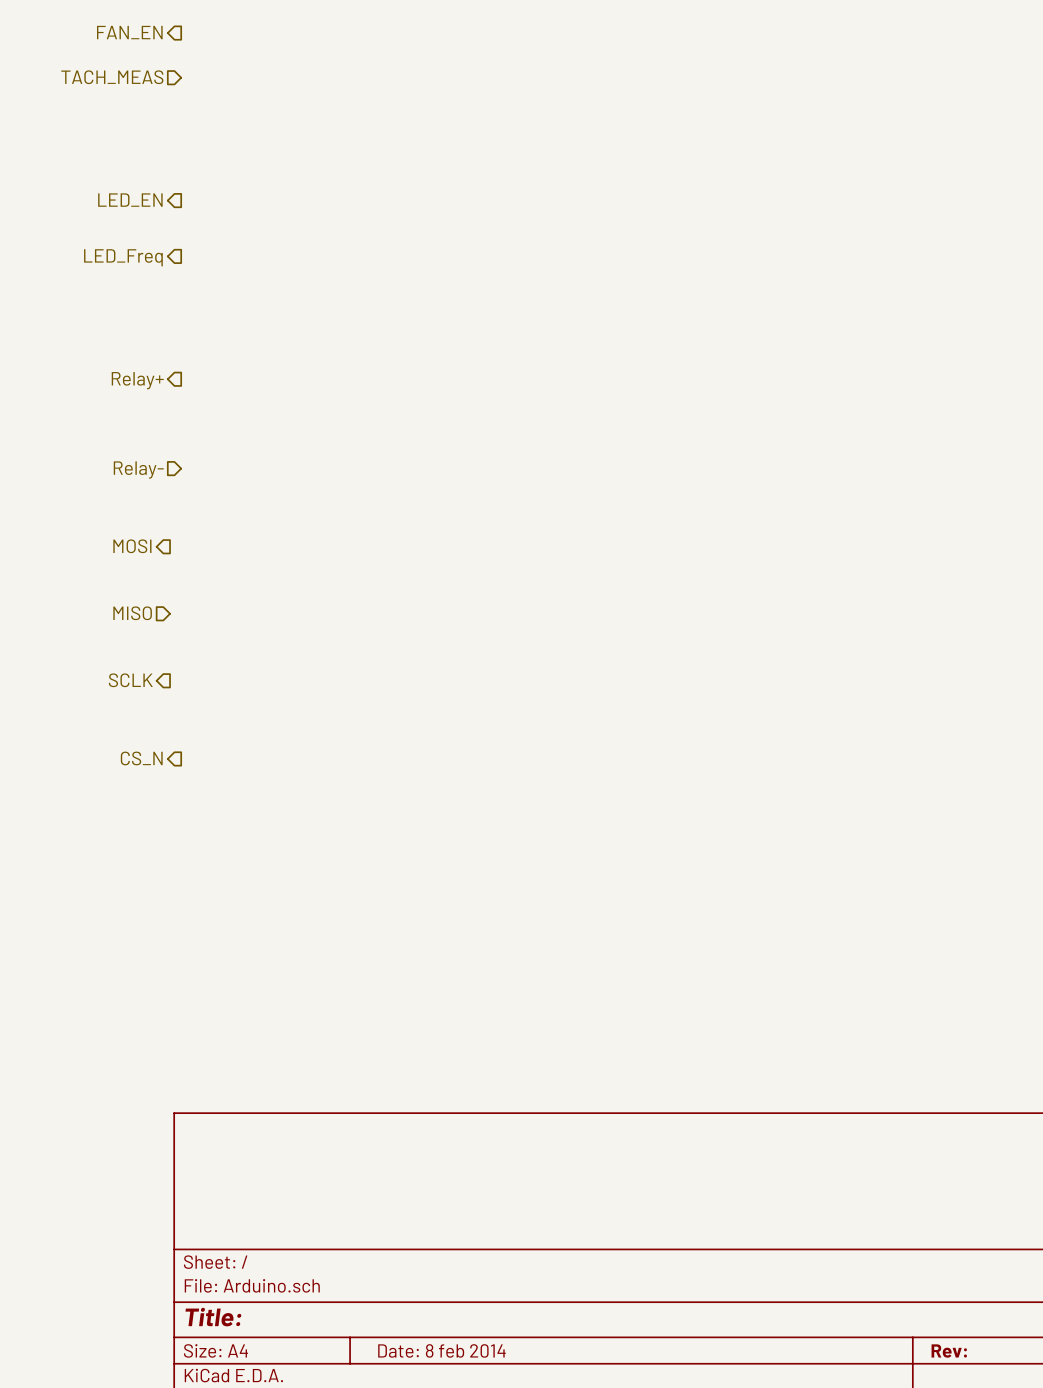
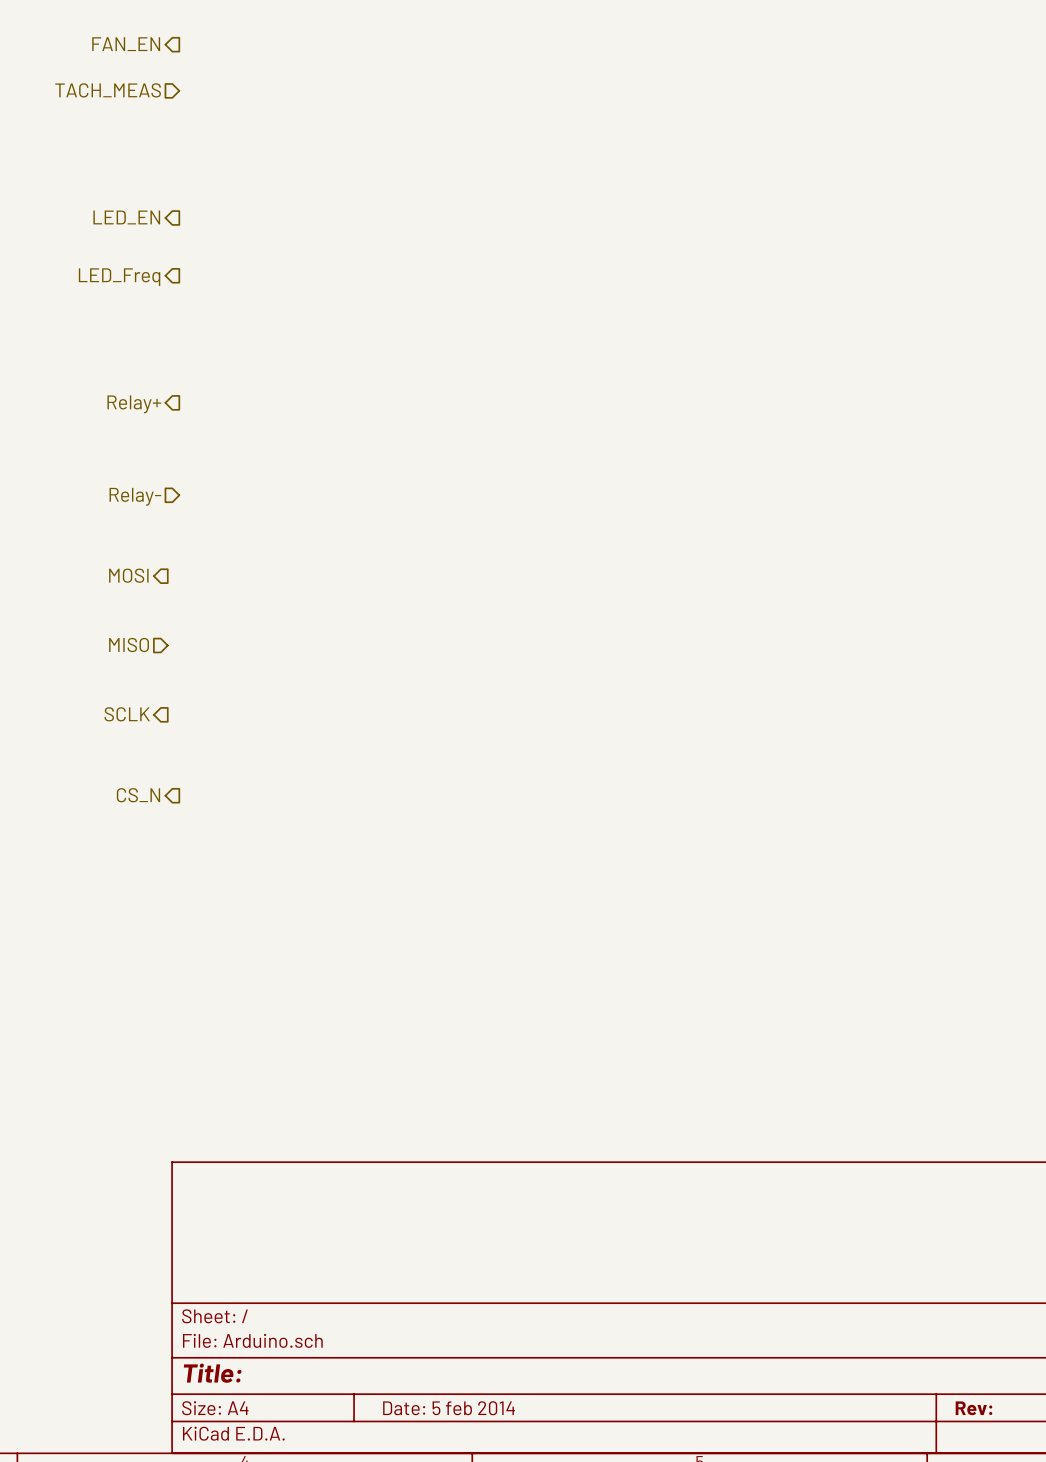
title block: Date: 8 feb 2014 (441, 1350) -> Date: 5 feb 2014 (449, 1408)

